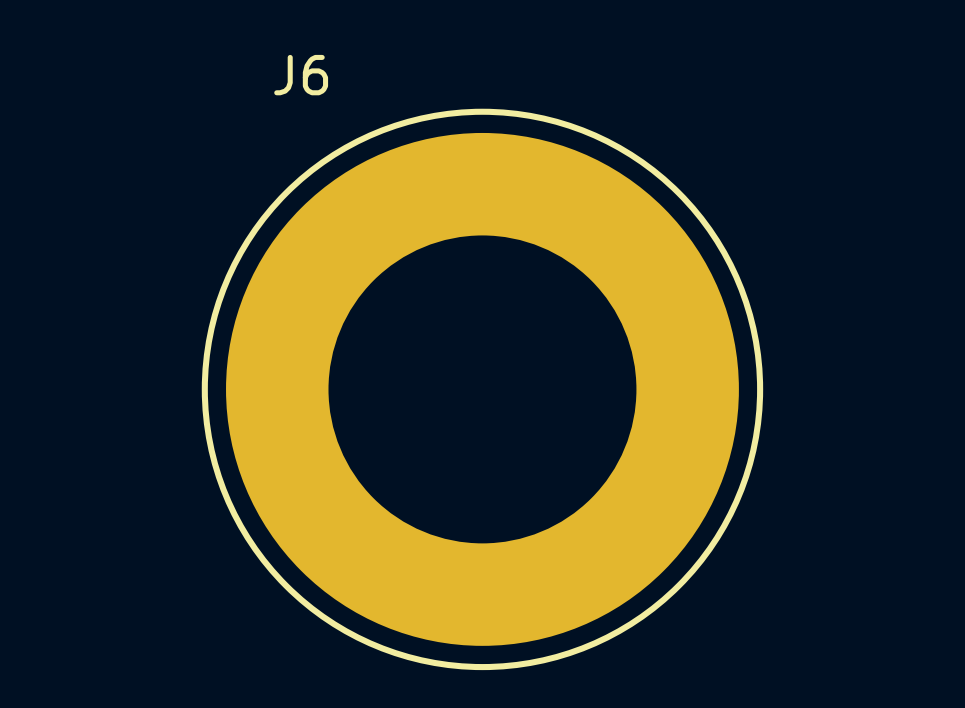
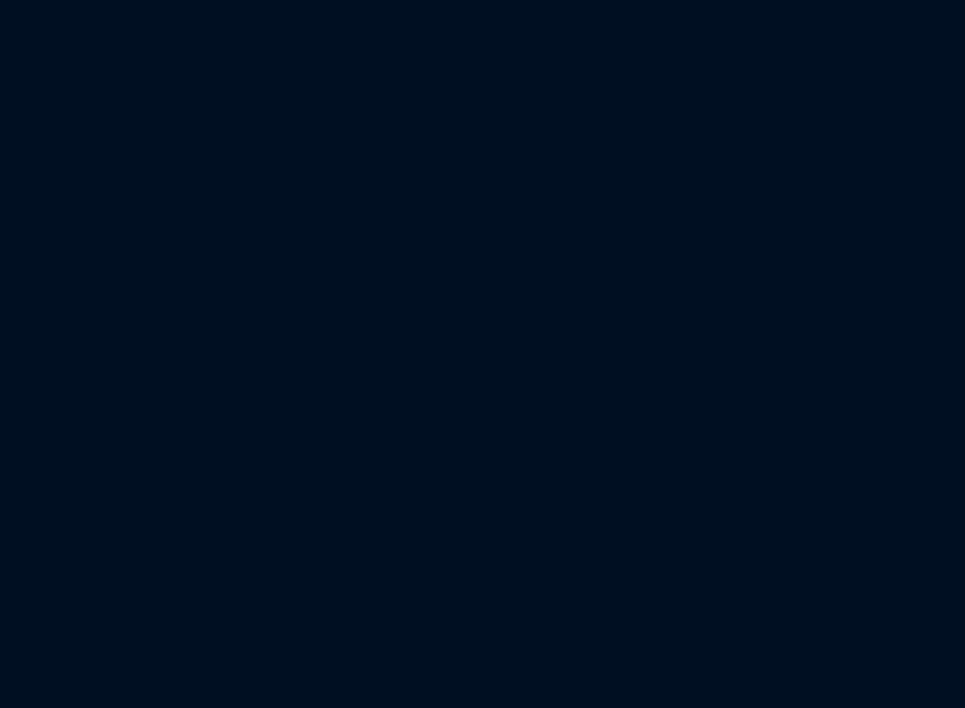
J6: (482, 389) -> none

